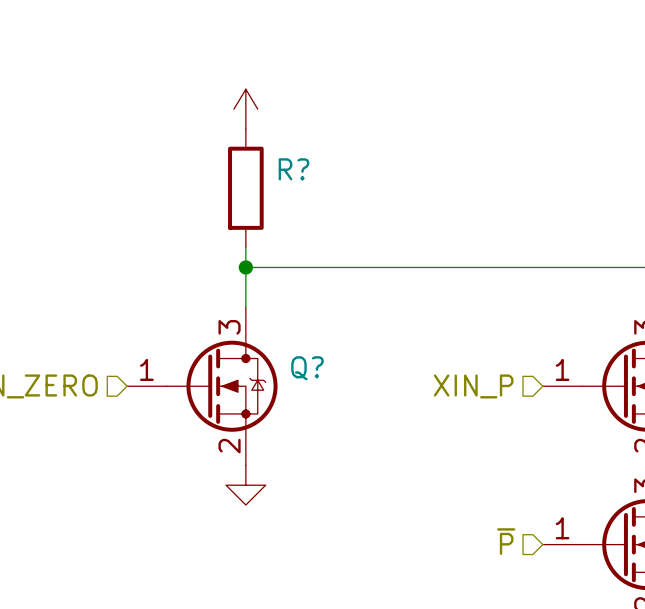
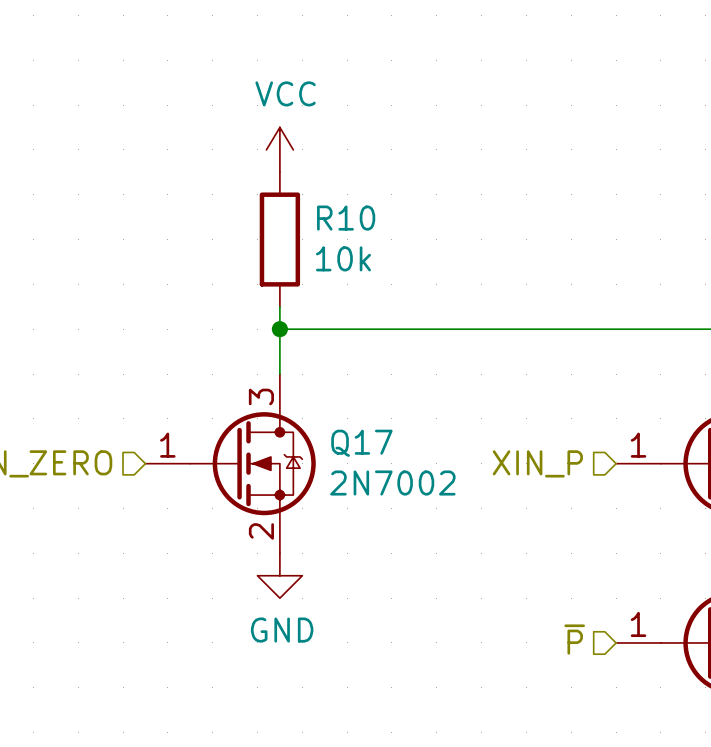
power symbol text: none -> VCC (285, 93)
R? name: R? (293, 169) -> R10 (346, 218)
R? value: none -> 10k (343, 258)
Q? name: Q? (307, 368) -> Q17 (361, 443)
Q? value: none -> 2N7002 (392, 483)
power symbol text: none -> GND (282, 630)

